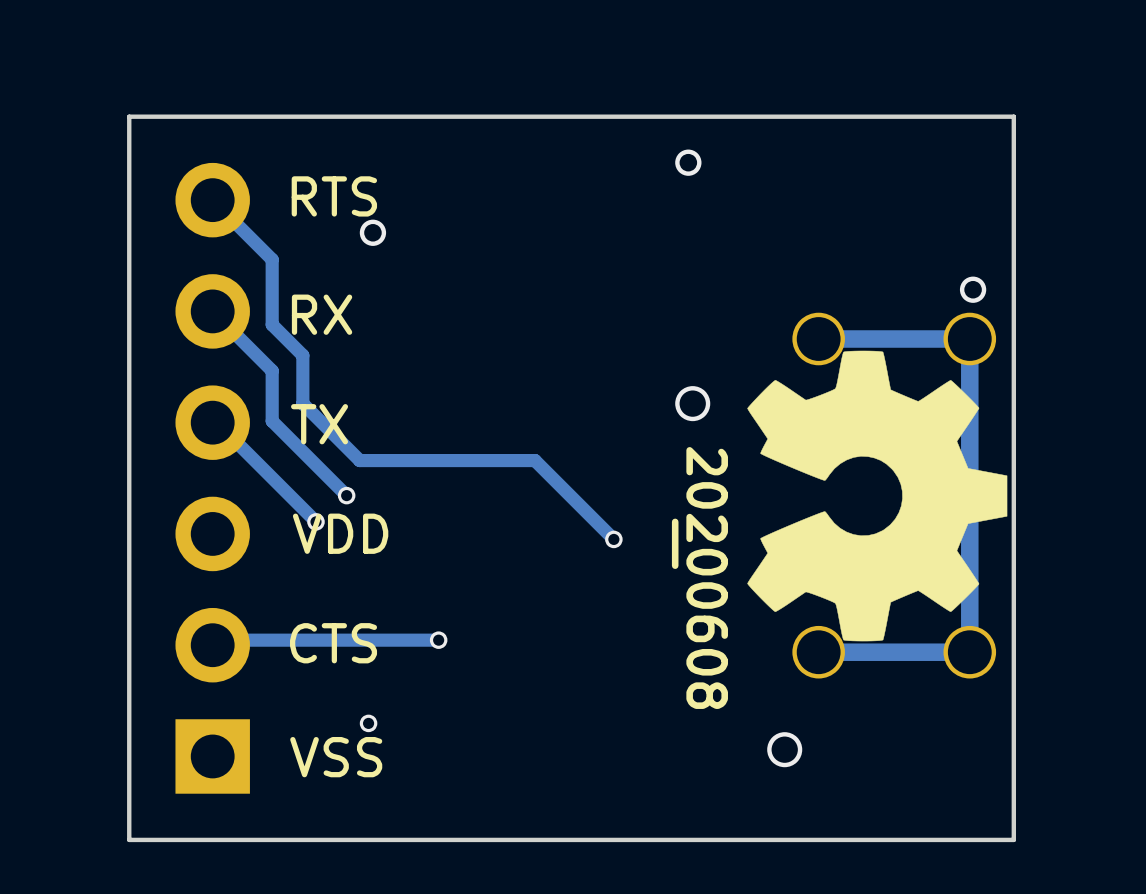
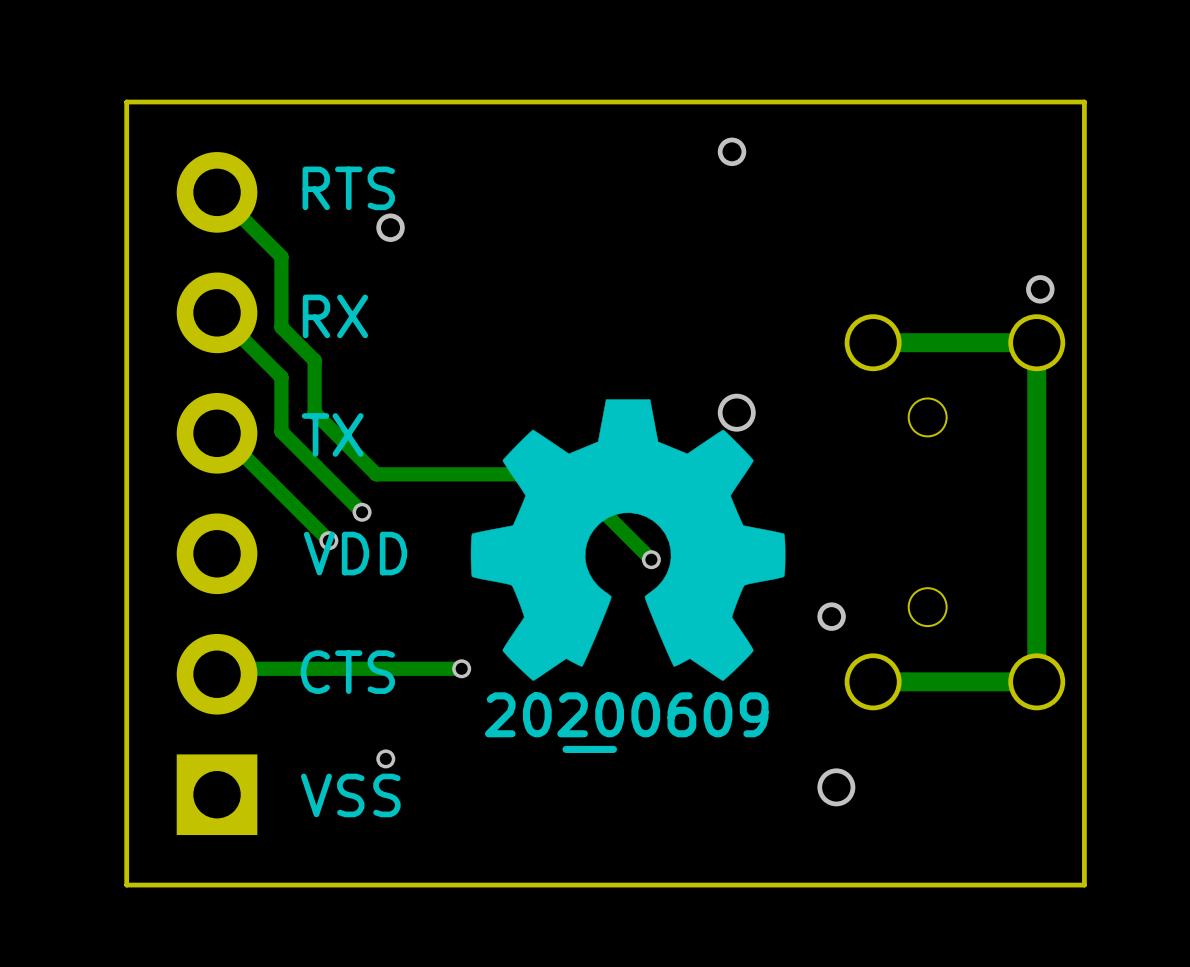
drawing: [671, 350, 1008, 642] -> none
drawing: none -> [470, 399, 786, 753]

